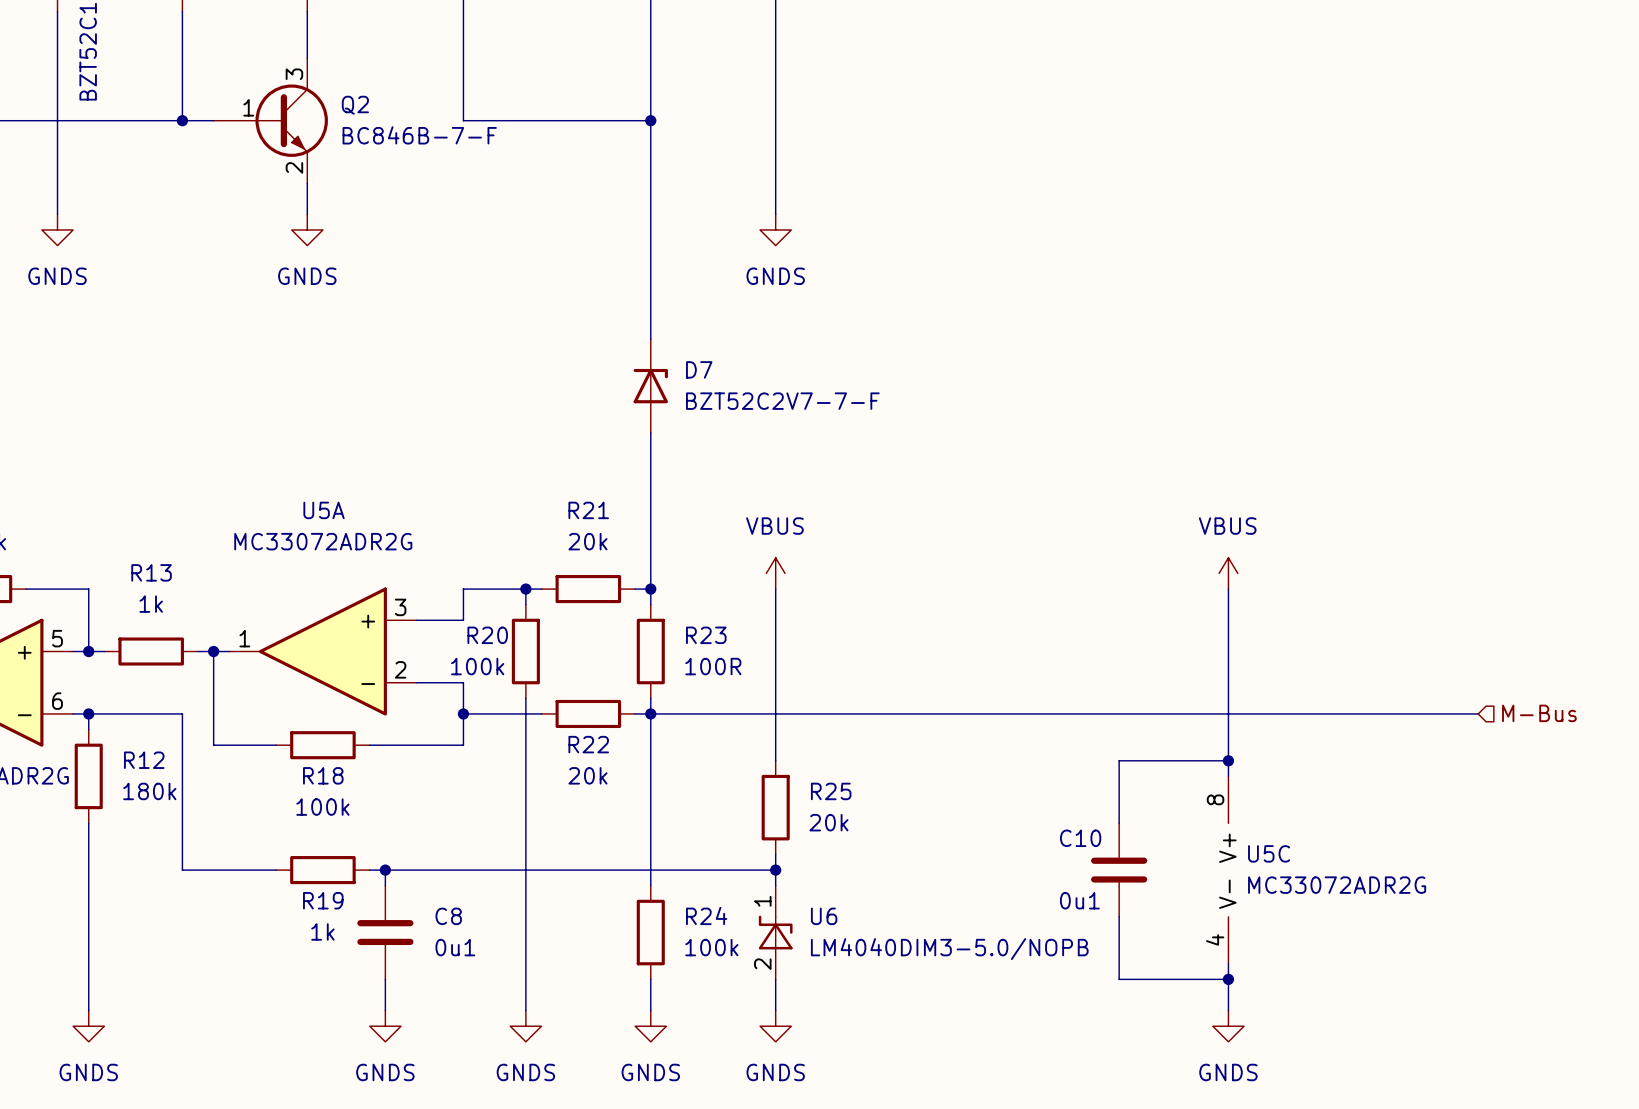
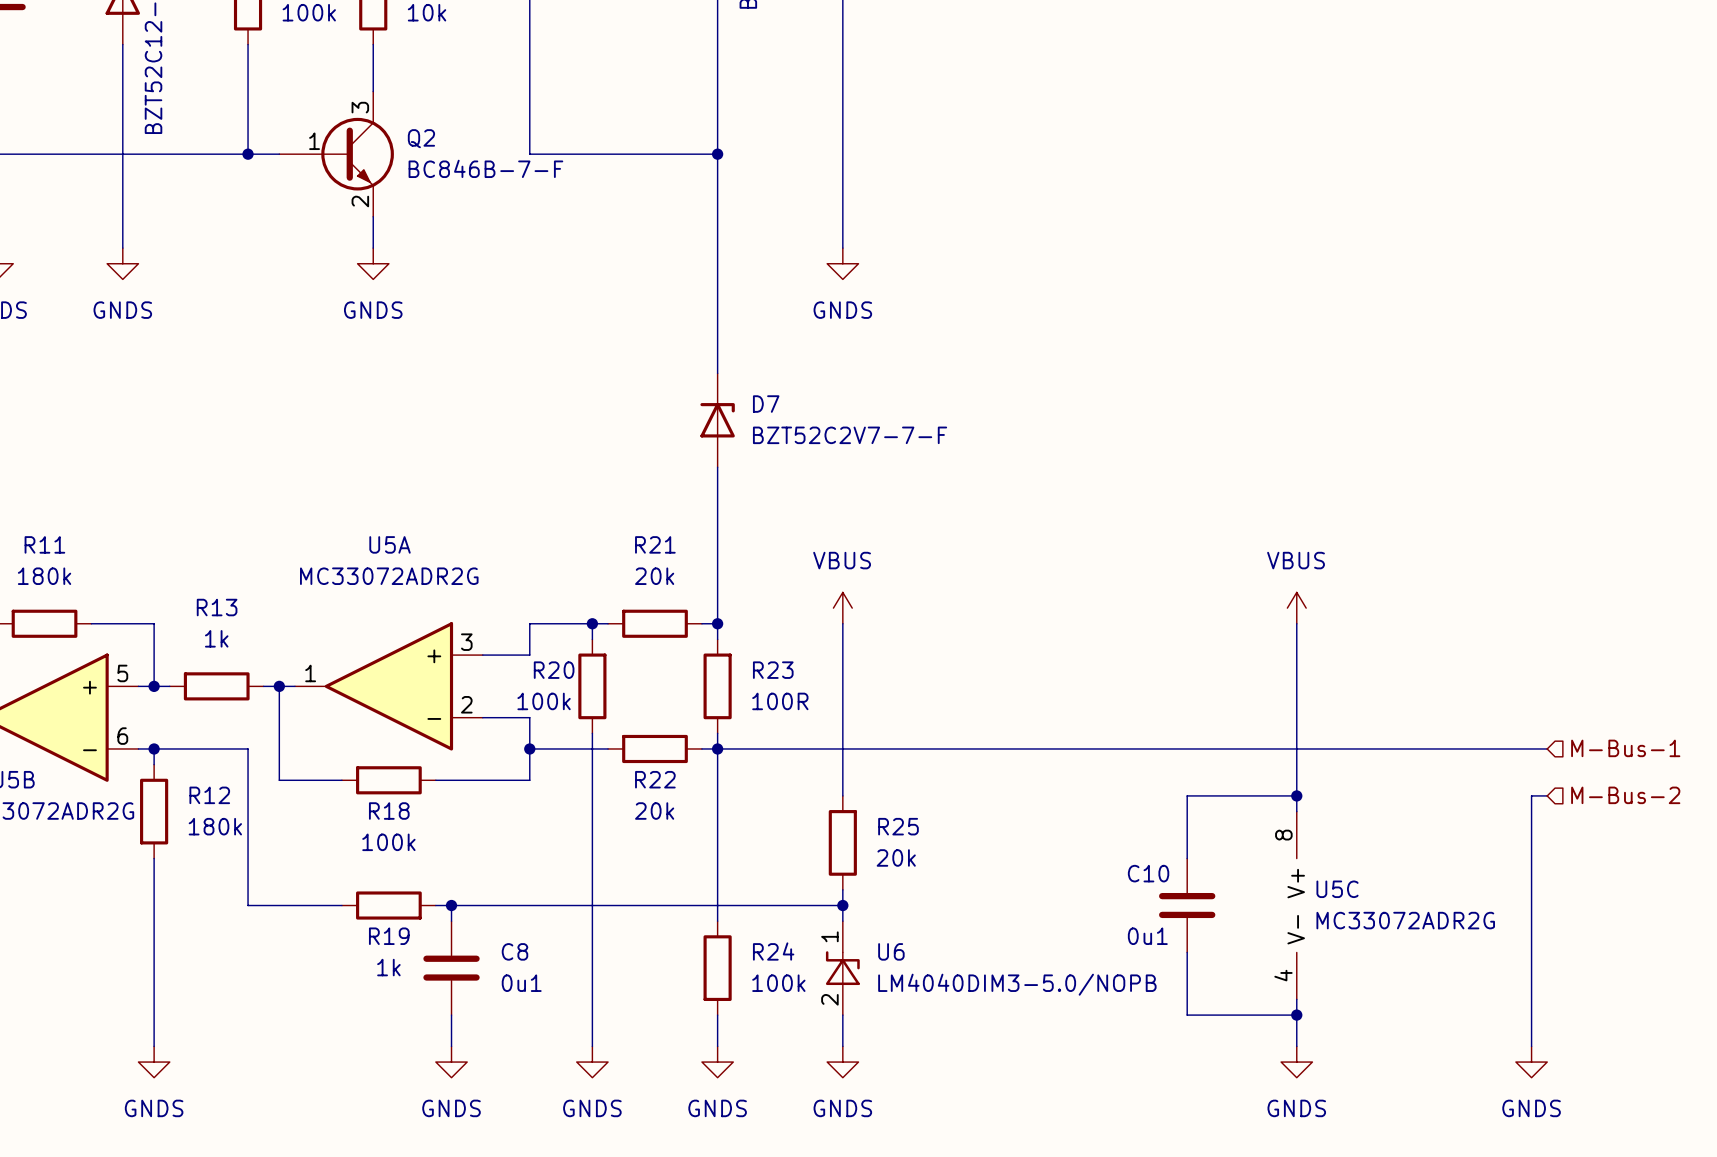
hierarchical label: M-Bus (1539, 713) -> M-Bus-1 (1625, 748)
wire: none -> (1547, 795) (1531, 795) (1531, 1046)
hierarchical label: none -> M-Bus-2 (1625, 795)
power symbol: none -> GNDS (1531, 1062)

